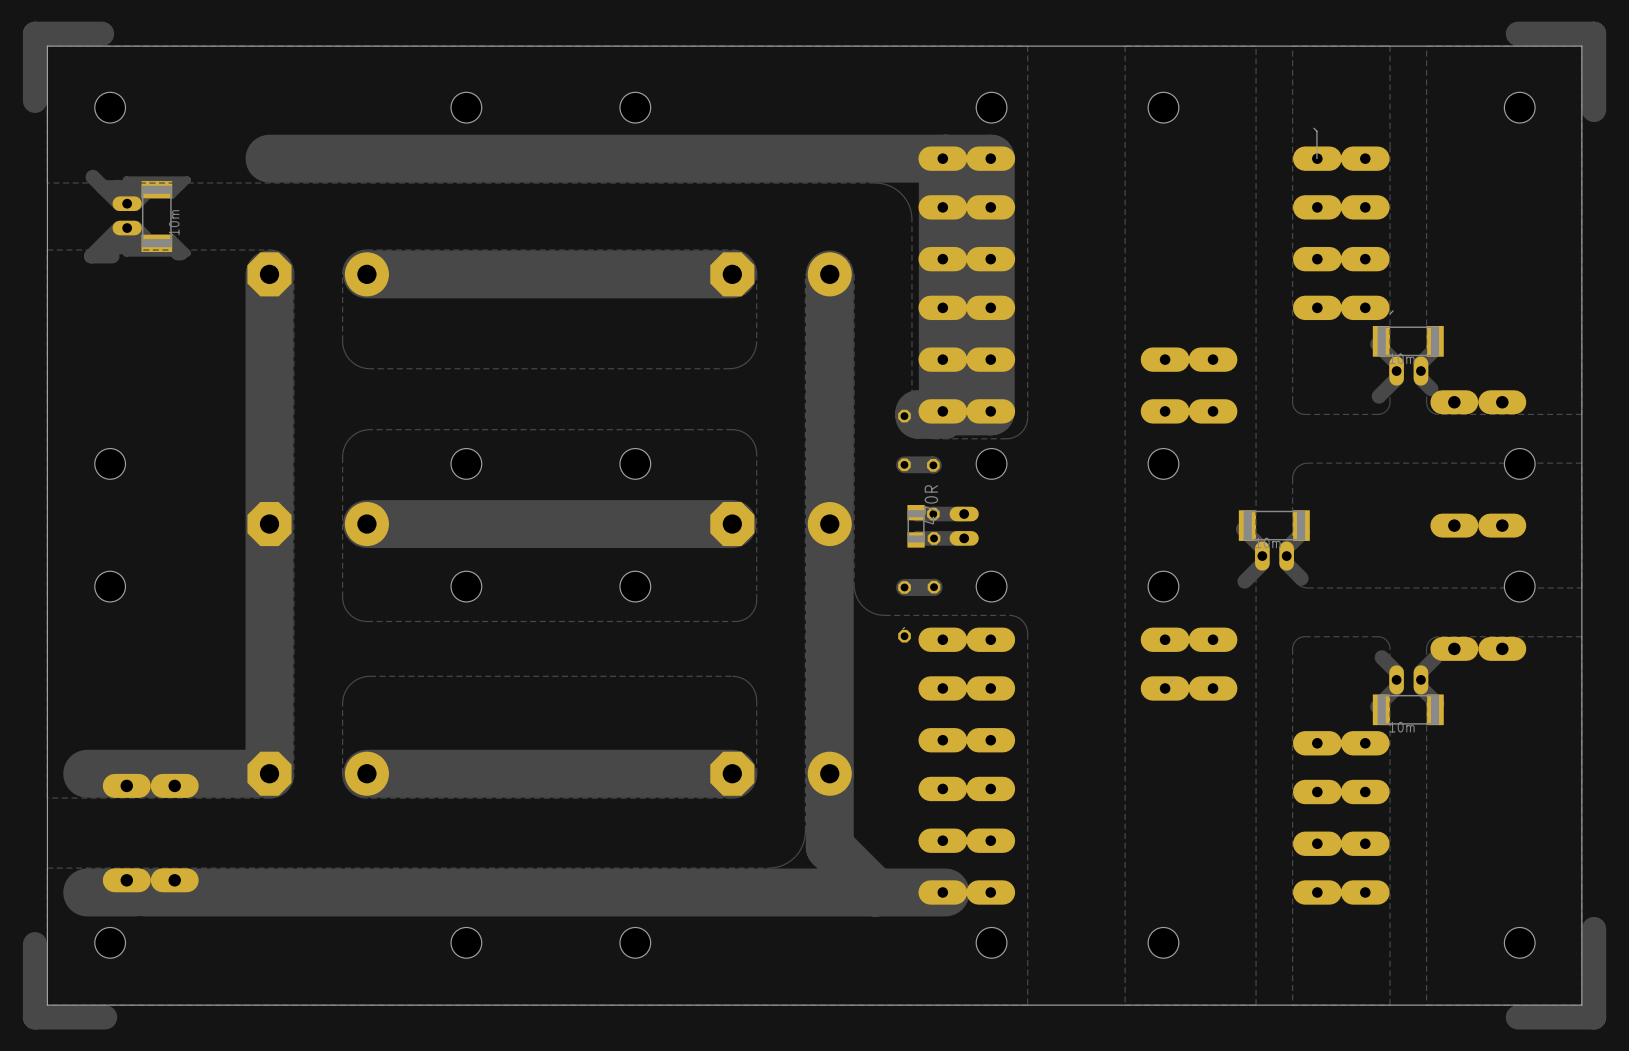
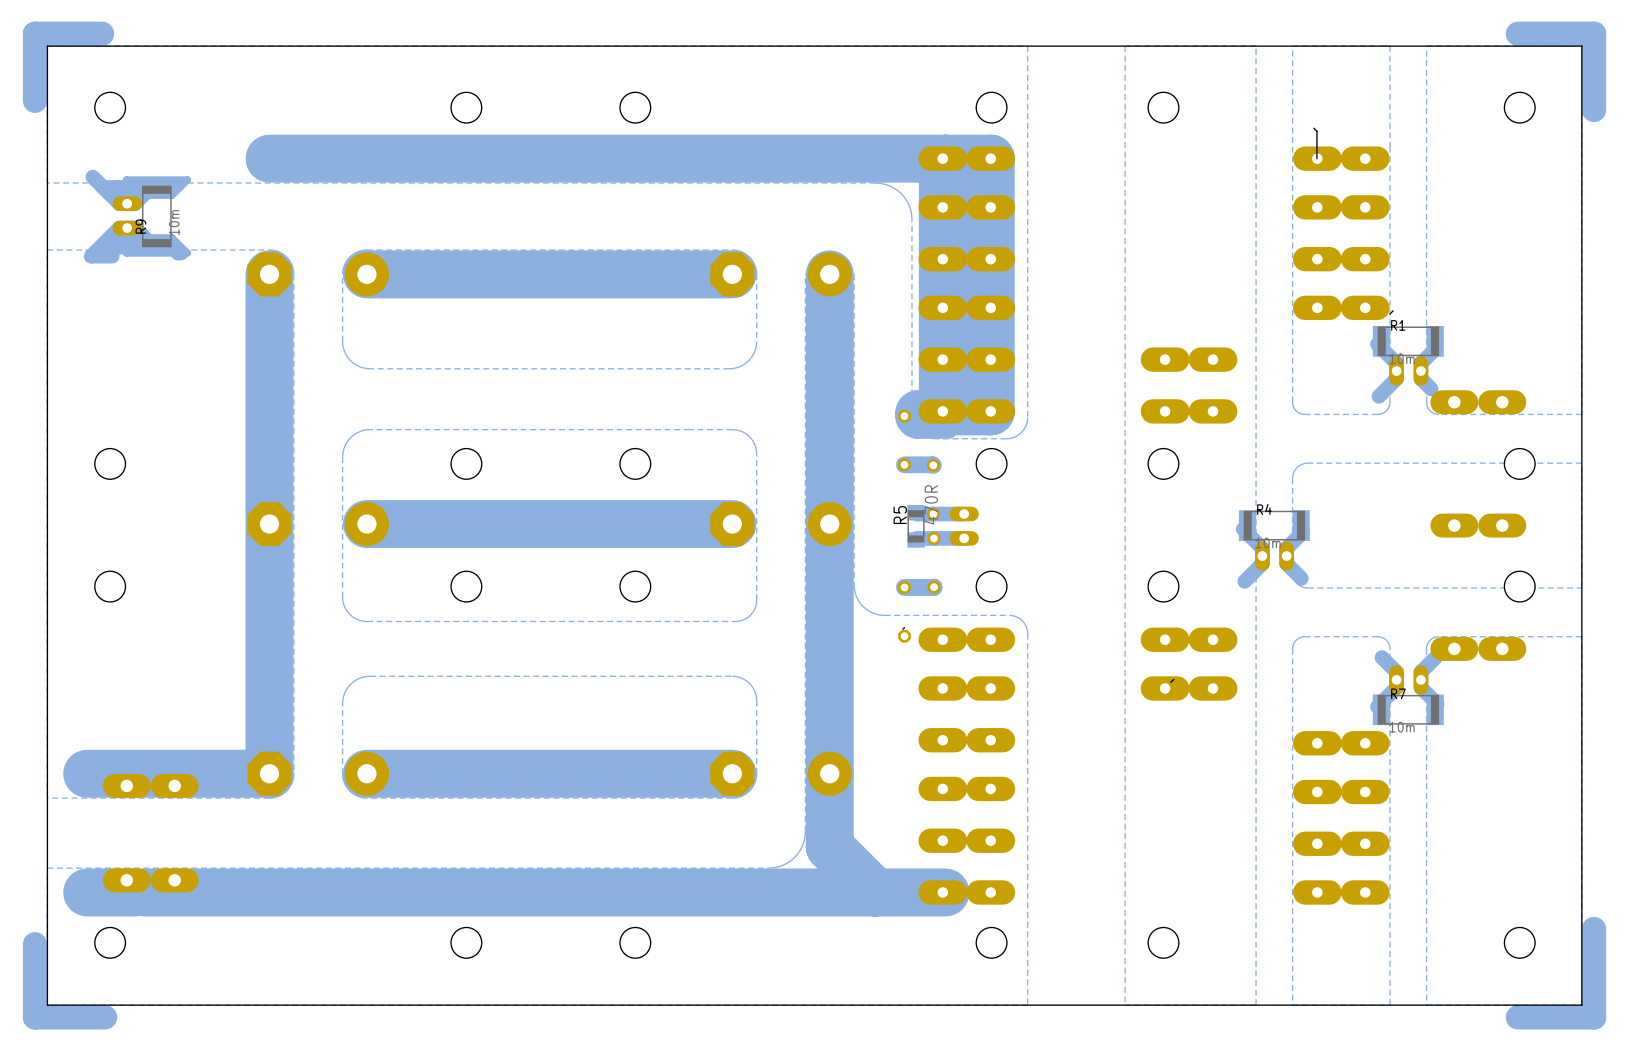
R9 name: none -> R9 (140, 226)
R1 name: none -> R1 (1398, 325)
R4 name: none -> R4 (1264, 509)
R5 name: none -> R5 (900, 515)
R7 name: none -> R7 (1398, 693)

